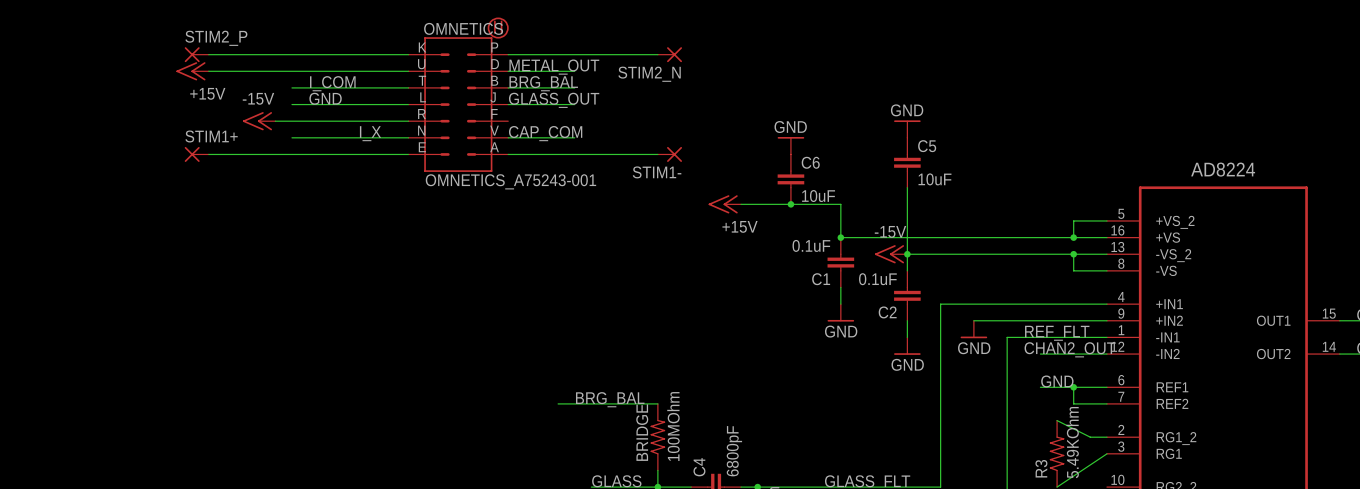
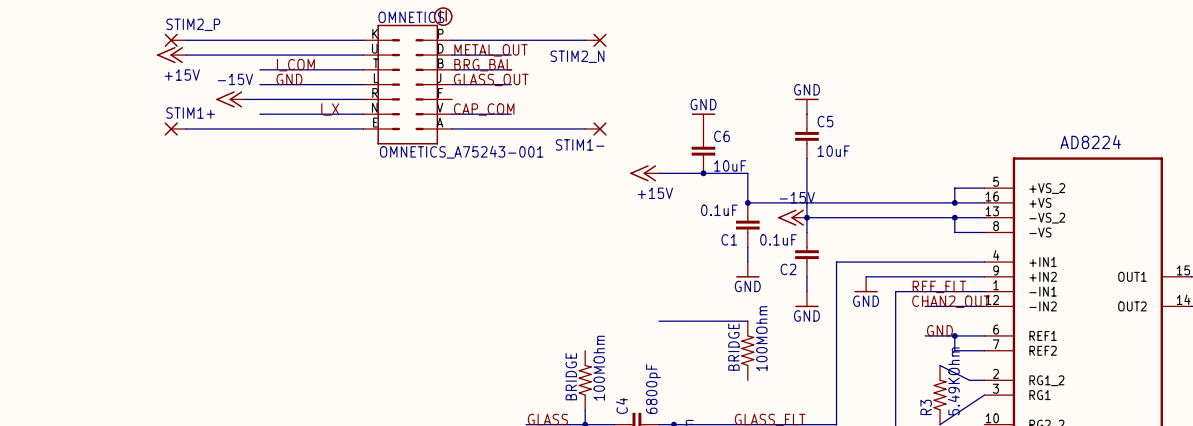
wire: none -> (659, 321) (747, 321)
label: BRG_BAL (610, 399) -> none
wire: (558, 403) (657, 403) -> none
BRIDGE: none -> 100MOhm (747, 350)

